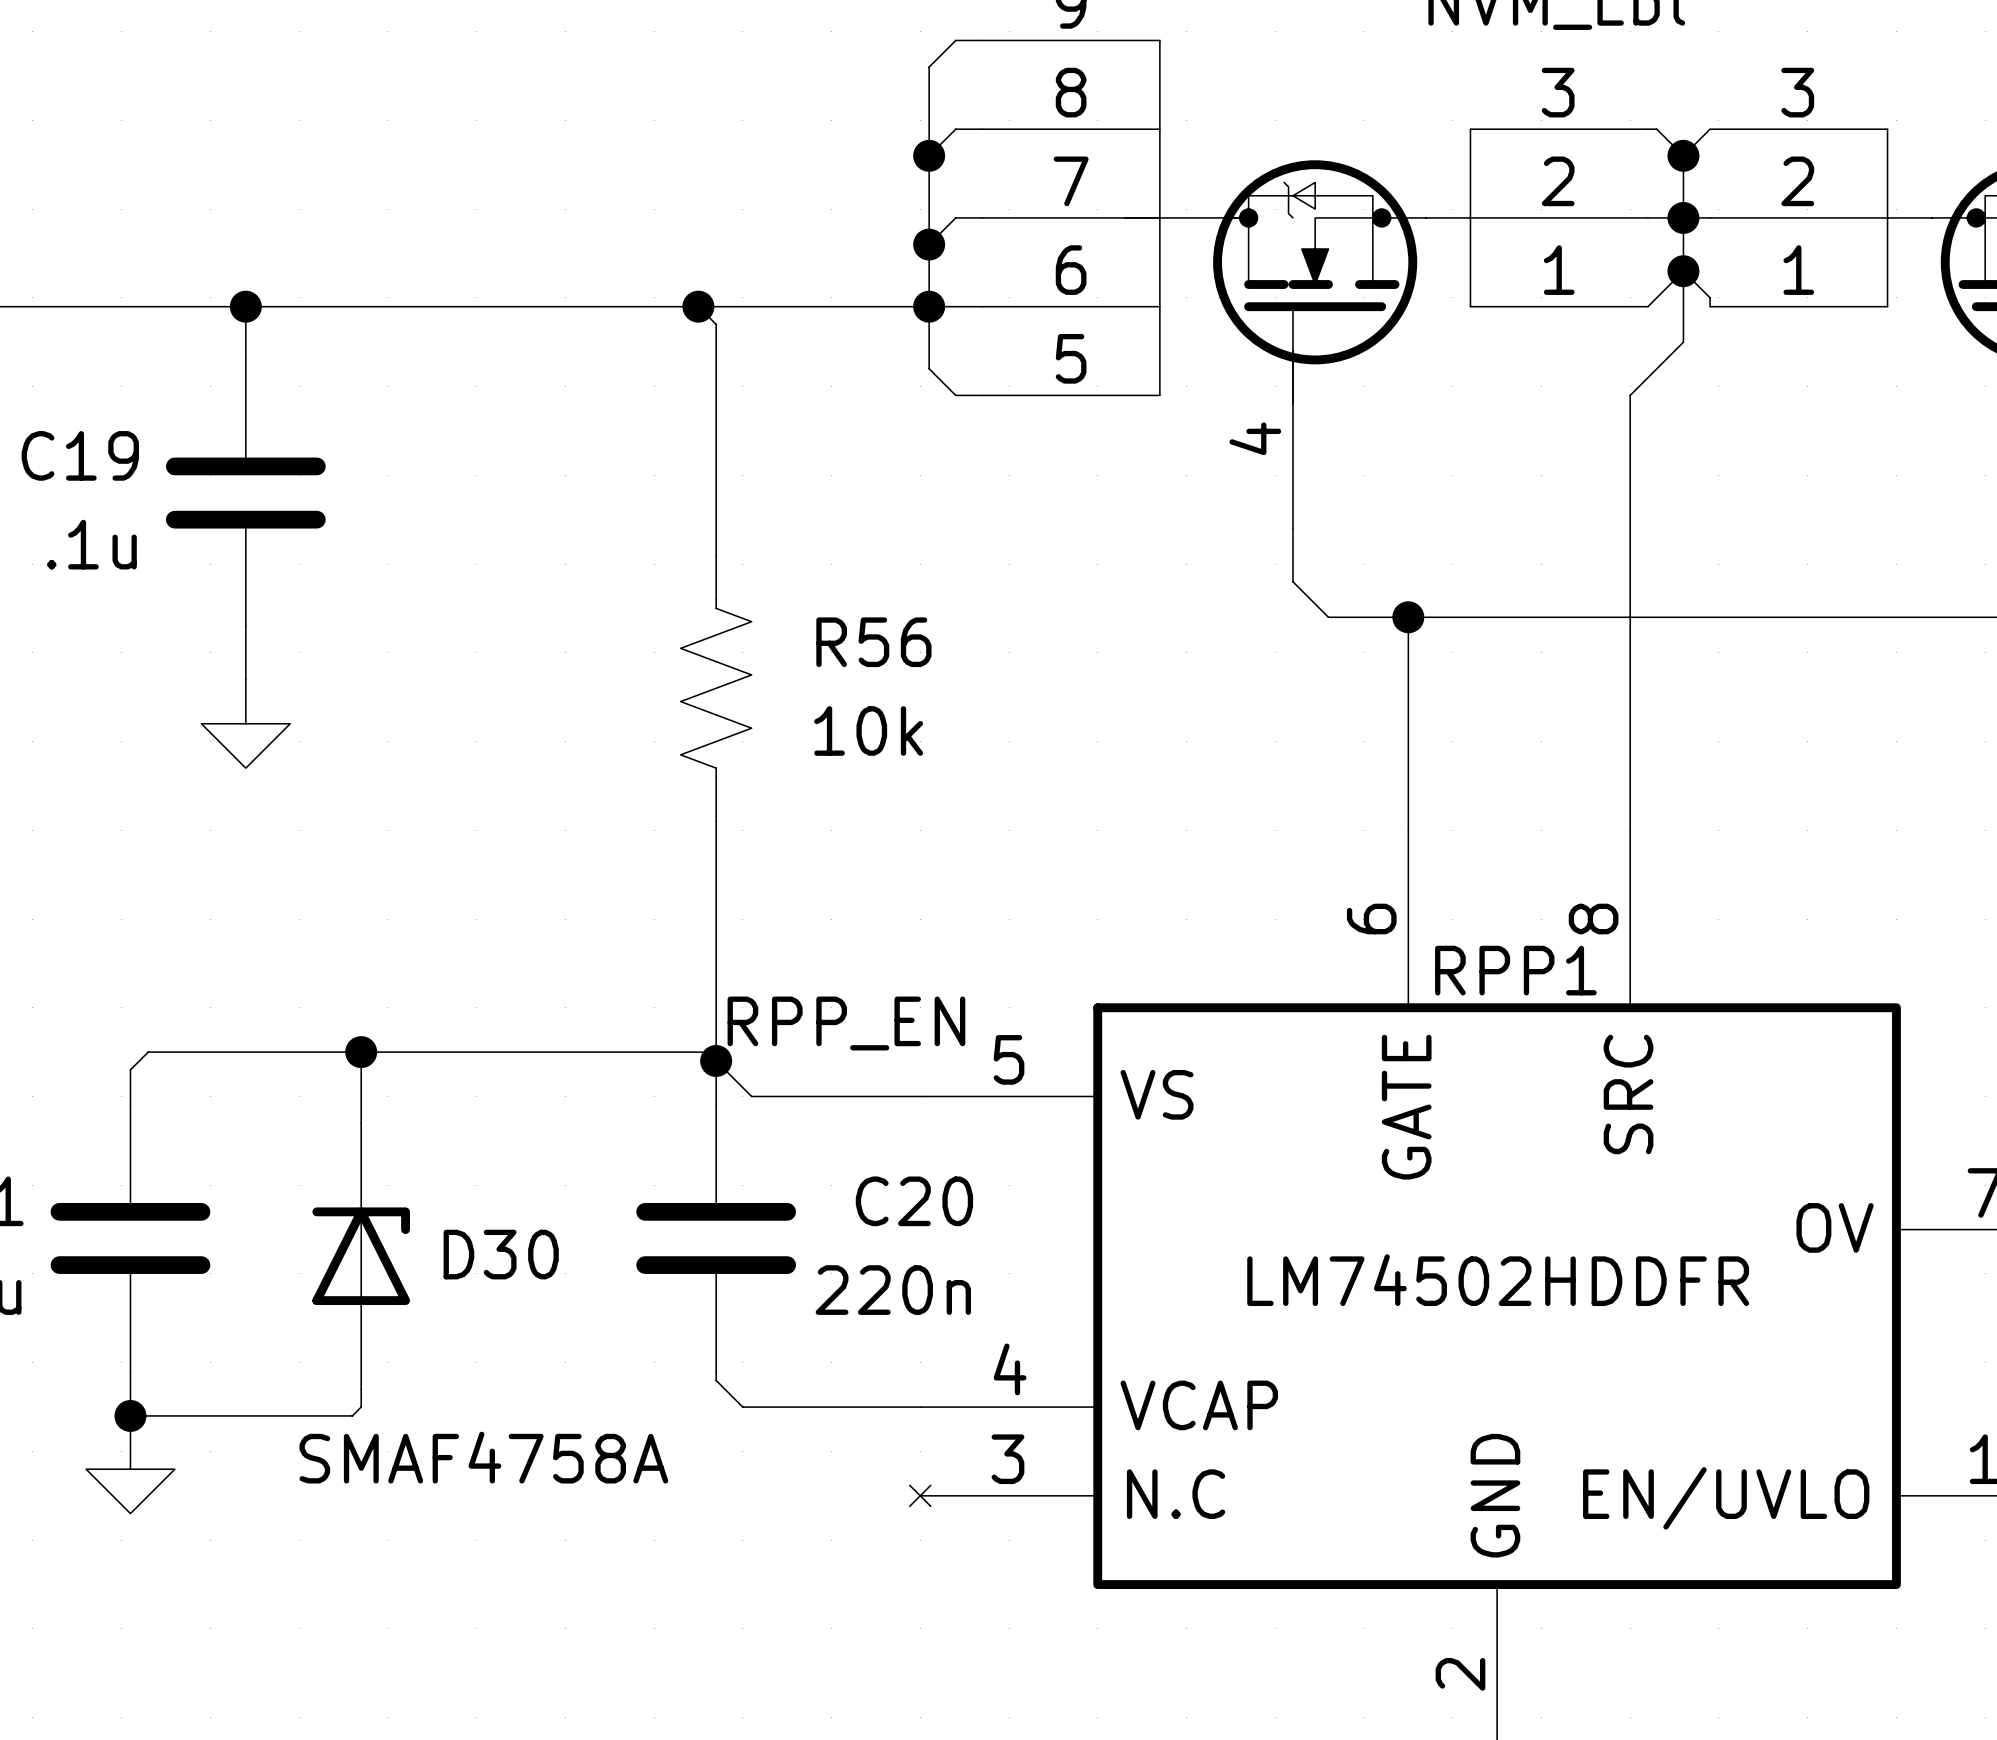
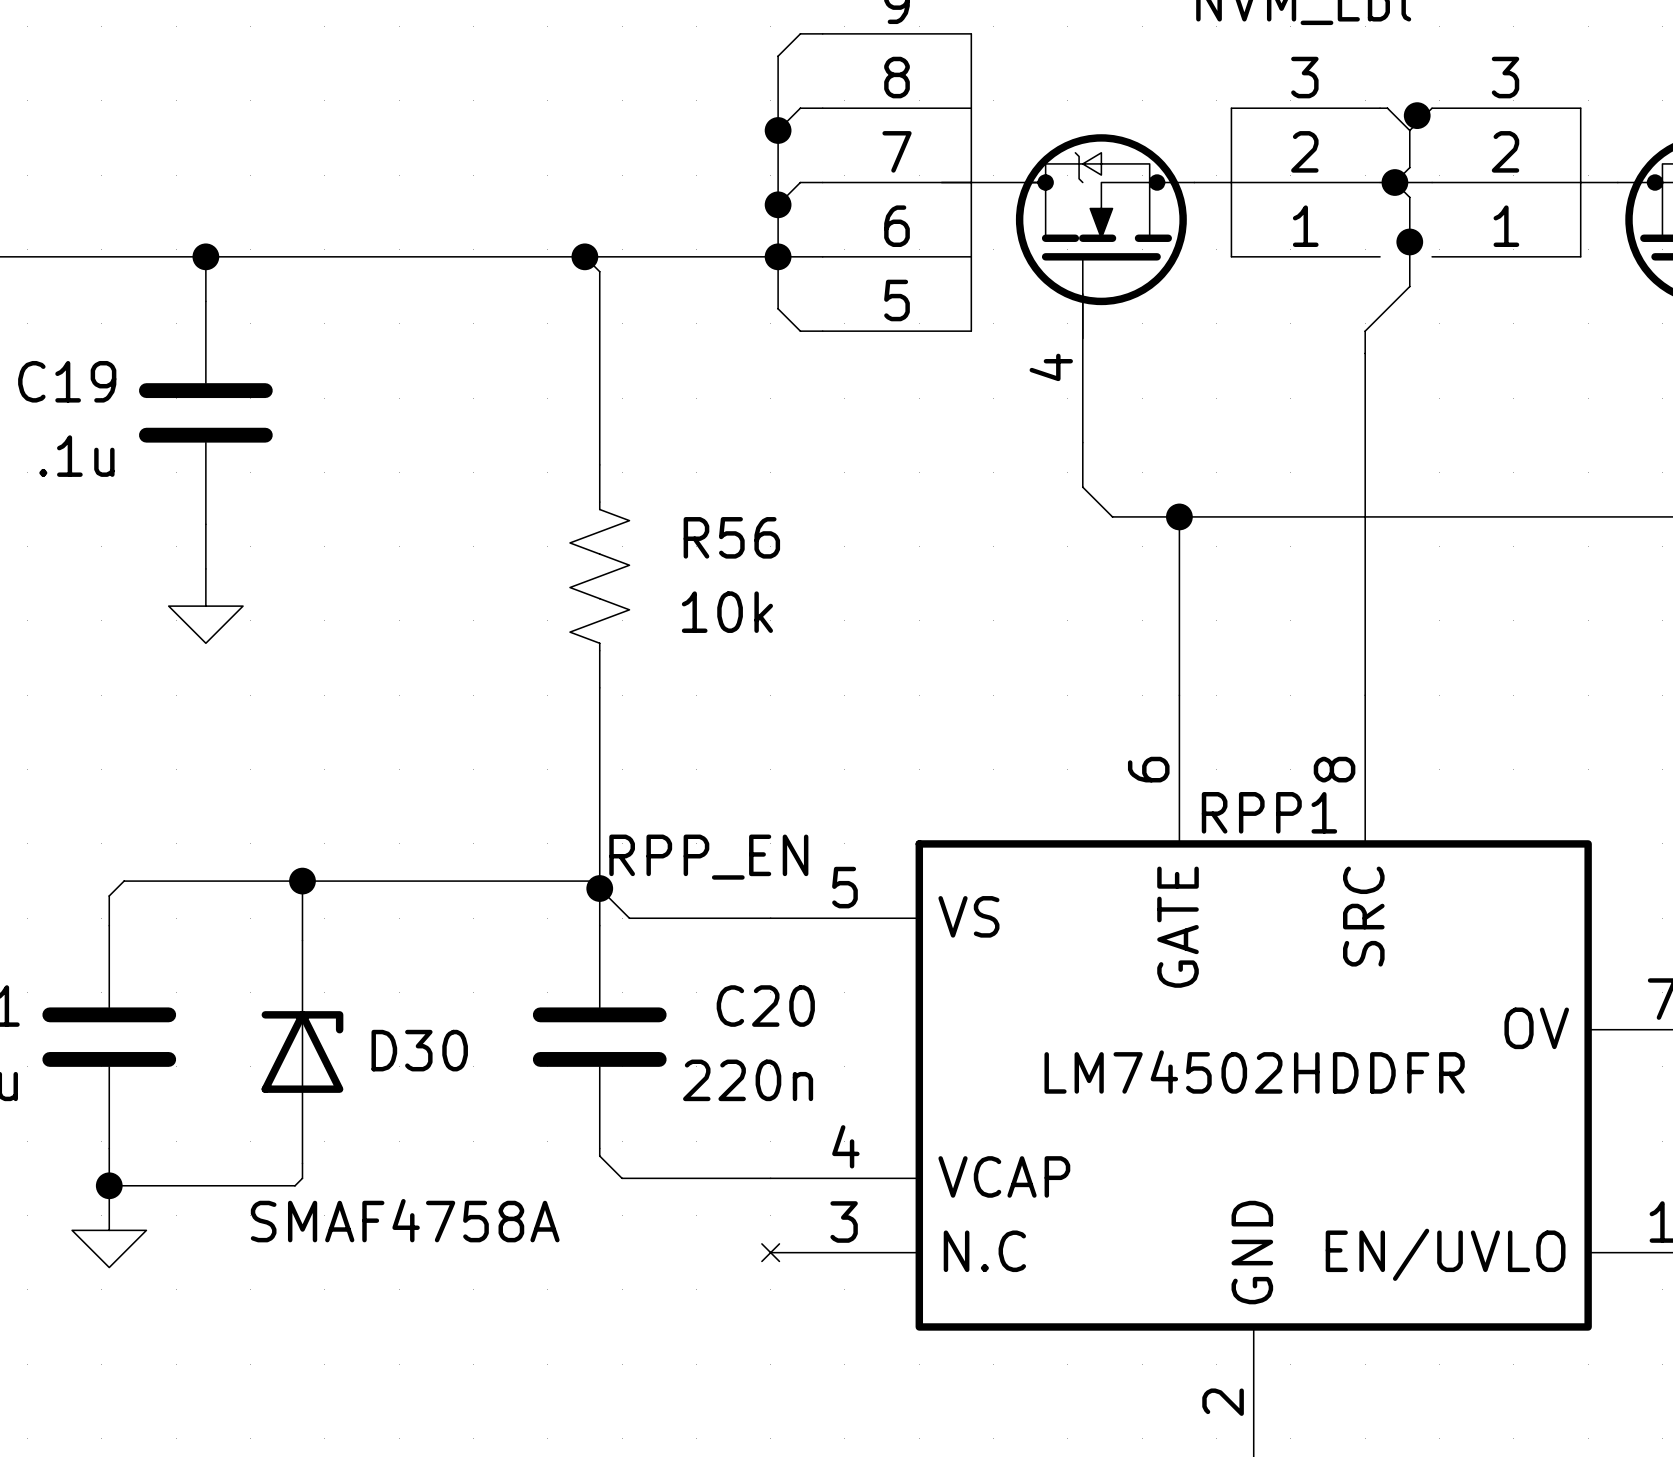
junction position: (1683, 155) -> (1417, 115)
junction position: (1683, 217) -> (1394, 182)
junction position: (1683, 271) -> (1409, 241)
wire: (1647, 306) (1683, 271) (1710, 297) (1710, 306) -> none

